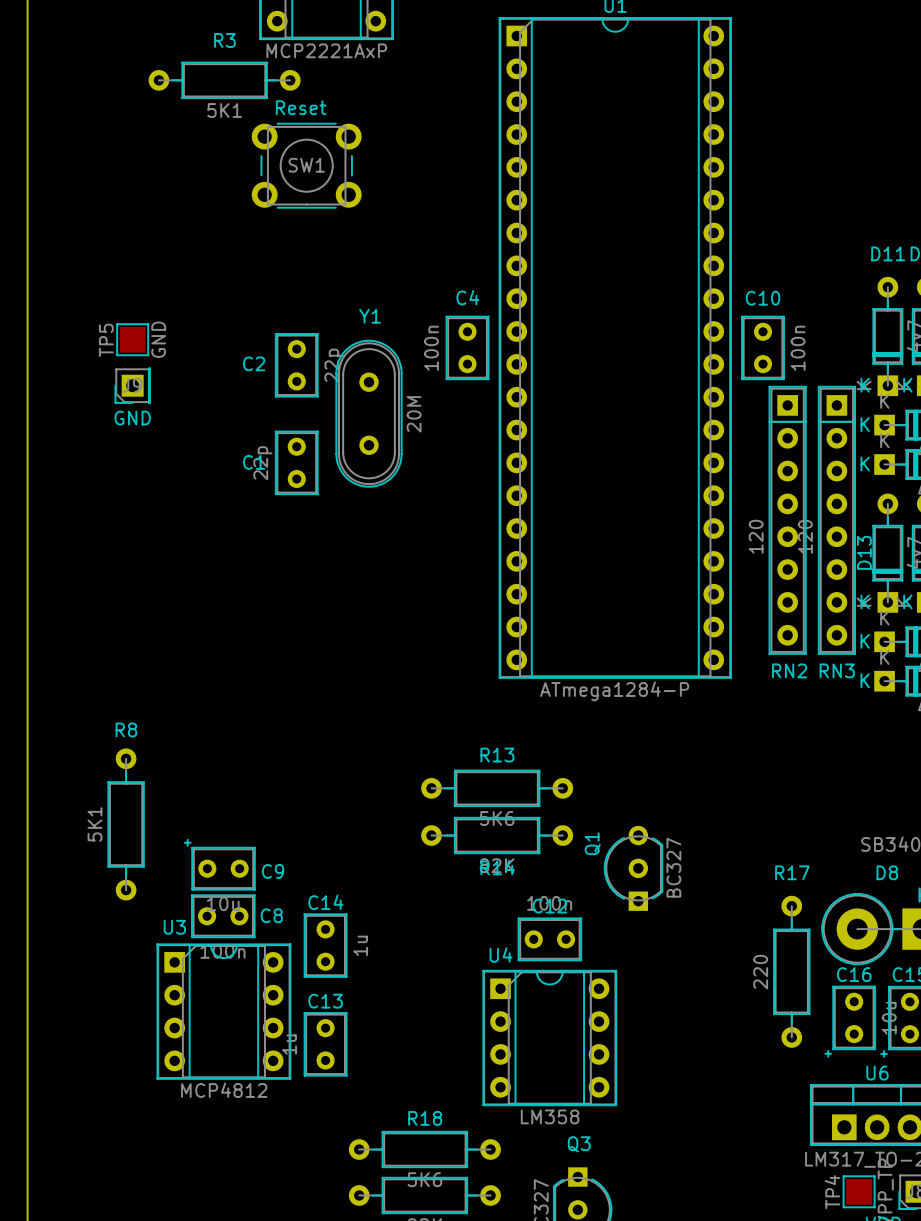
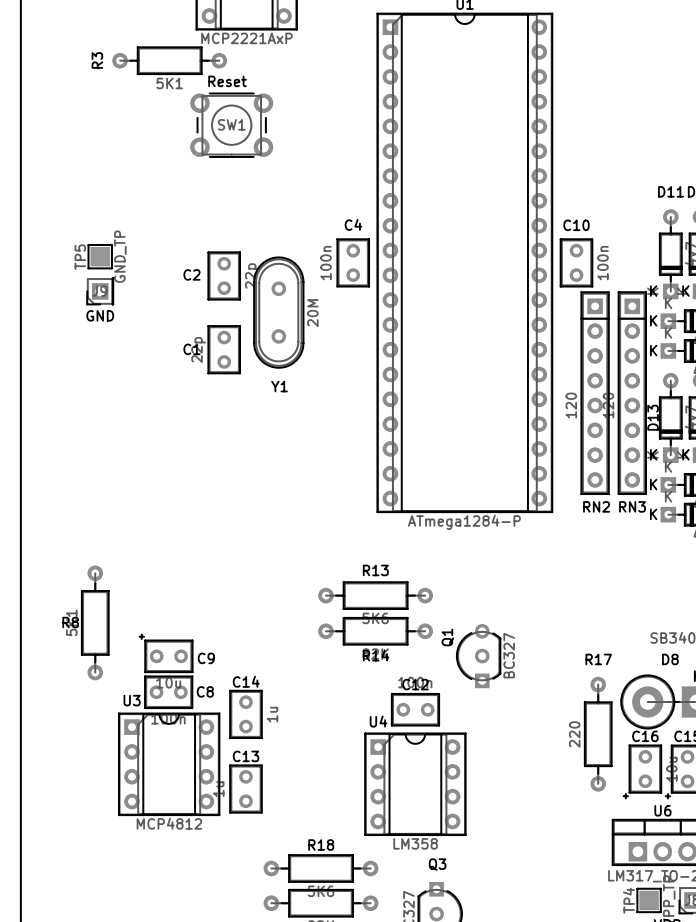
R3 name rotation: 0° (224, 40) -> 90° counterclockwise (97, 60)
R3 name position: R3 (224, 40) -> R3 (97, 60)
Y1 name position: Y1 (370, 316) -> Y1 (279, 386)
TP5 value: GND (158, 339) -> GND_TP (120, 256)
R8 name position: R8 (126, 729) -> R8 (70, 622)

